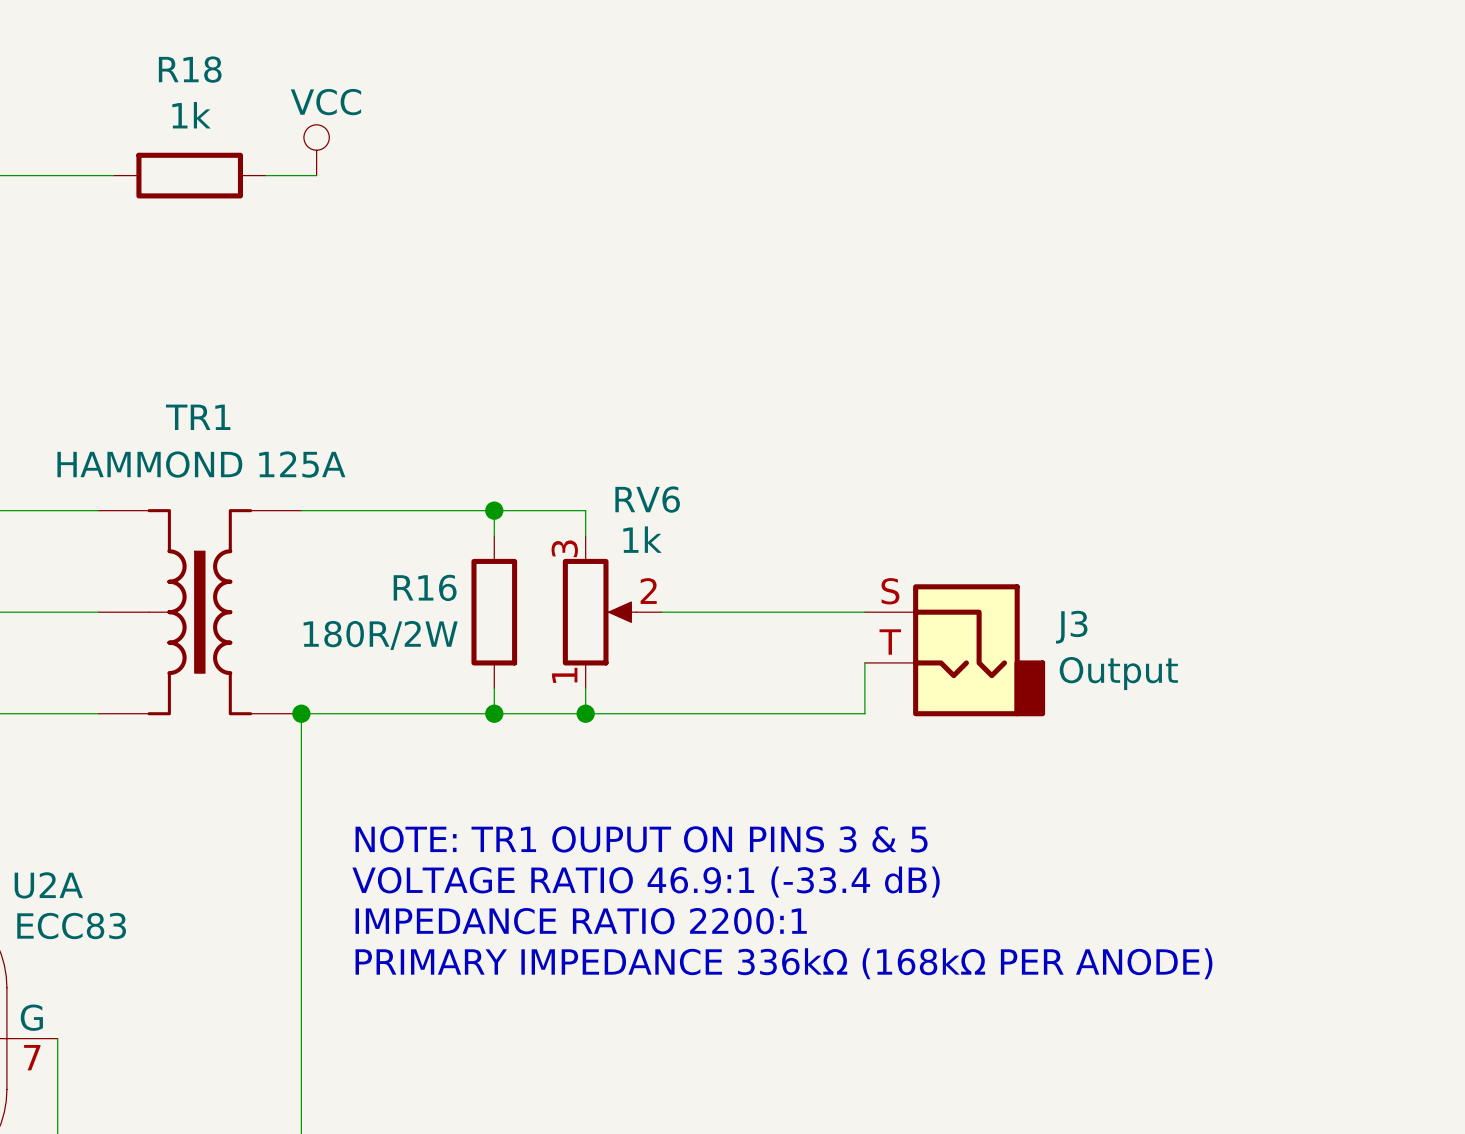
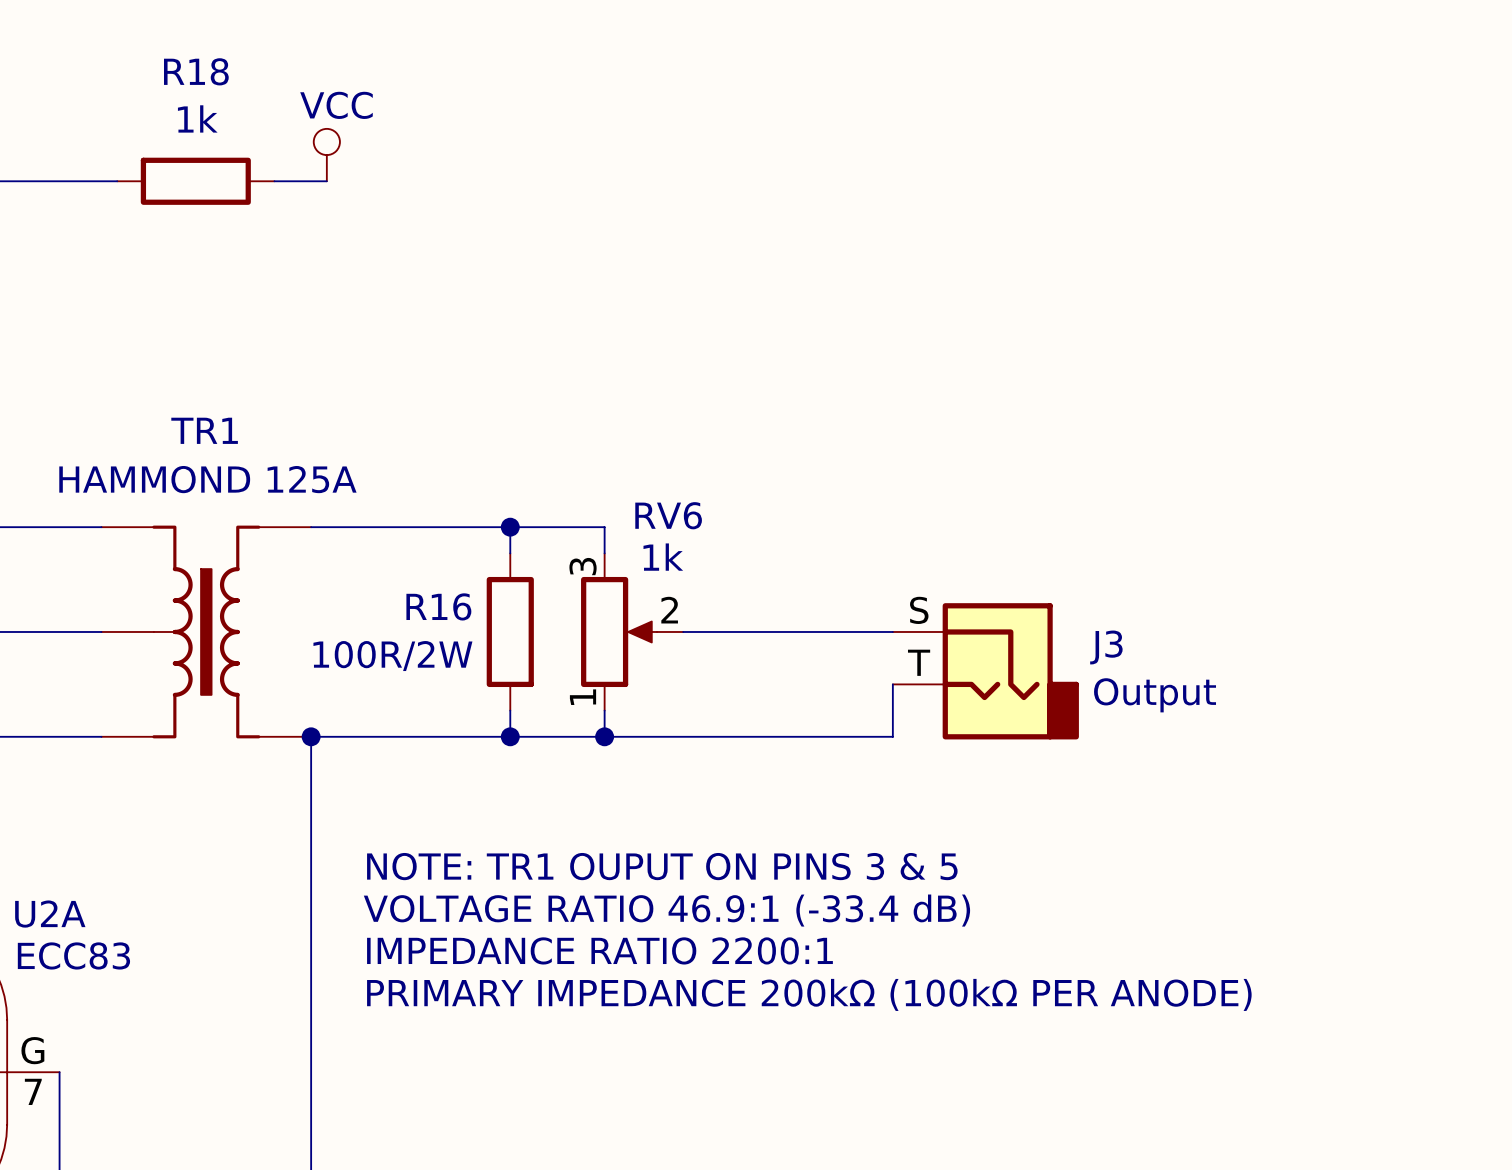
R16 value: 180R/2W (380, 635) -> 100R/2W (392, 656)
text: PRIMARY IMPEDANCE 336kΩ (168kΩ PER ANODE) (783, 963) -> PRIMARY IMPEDANCE 200kΩ (100kΩ PER ANODE) (809, 994)

